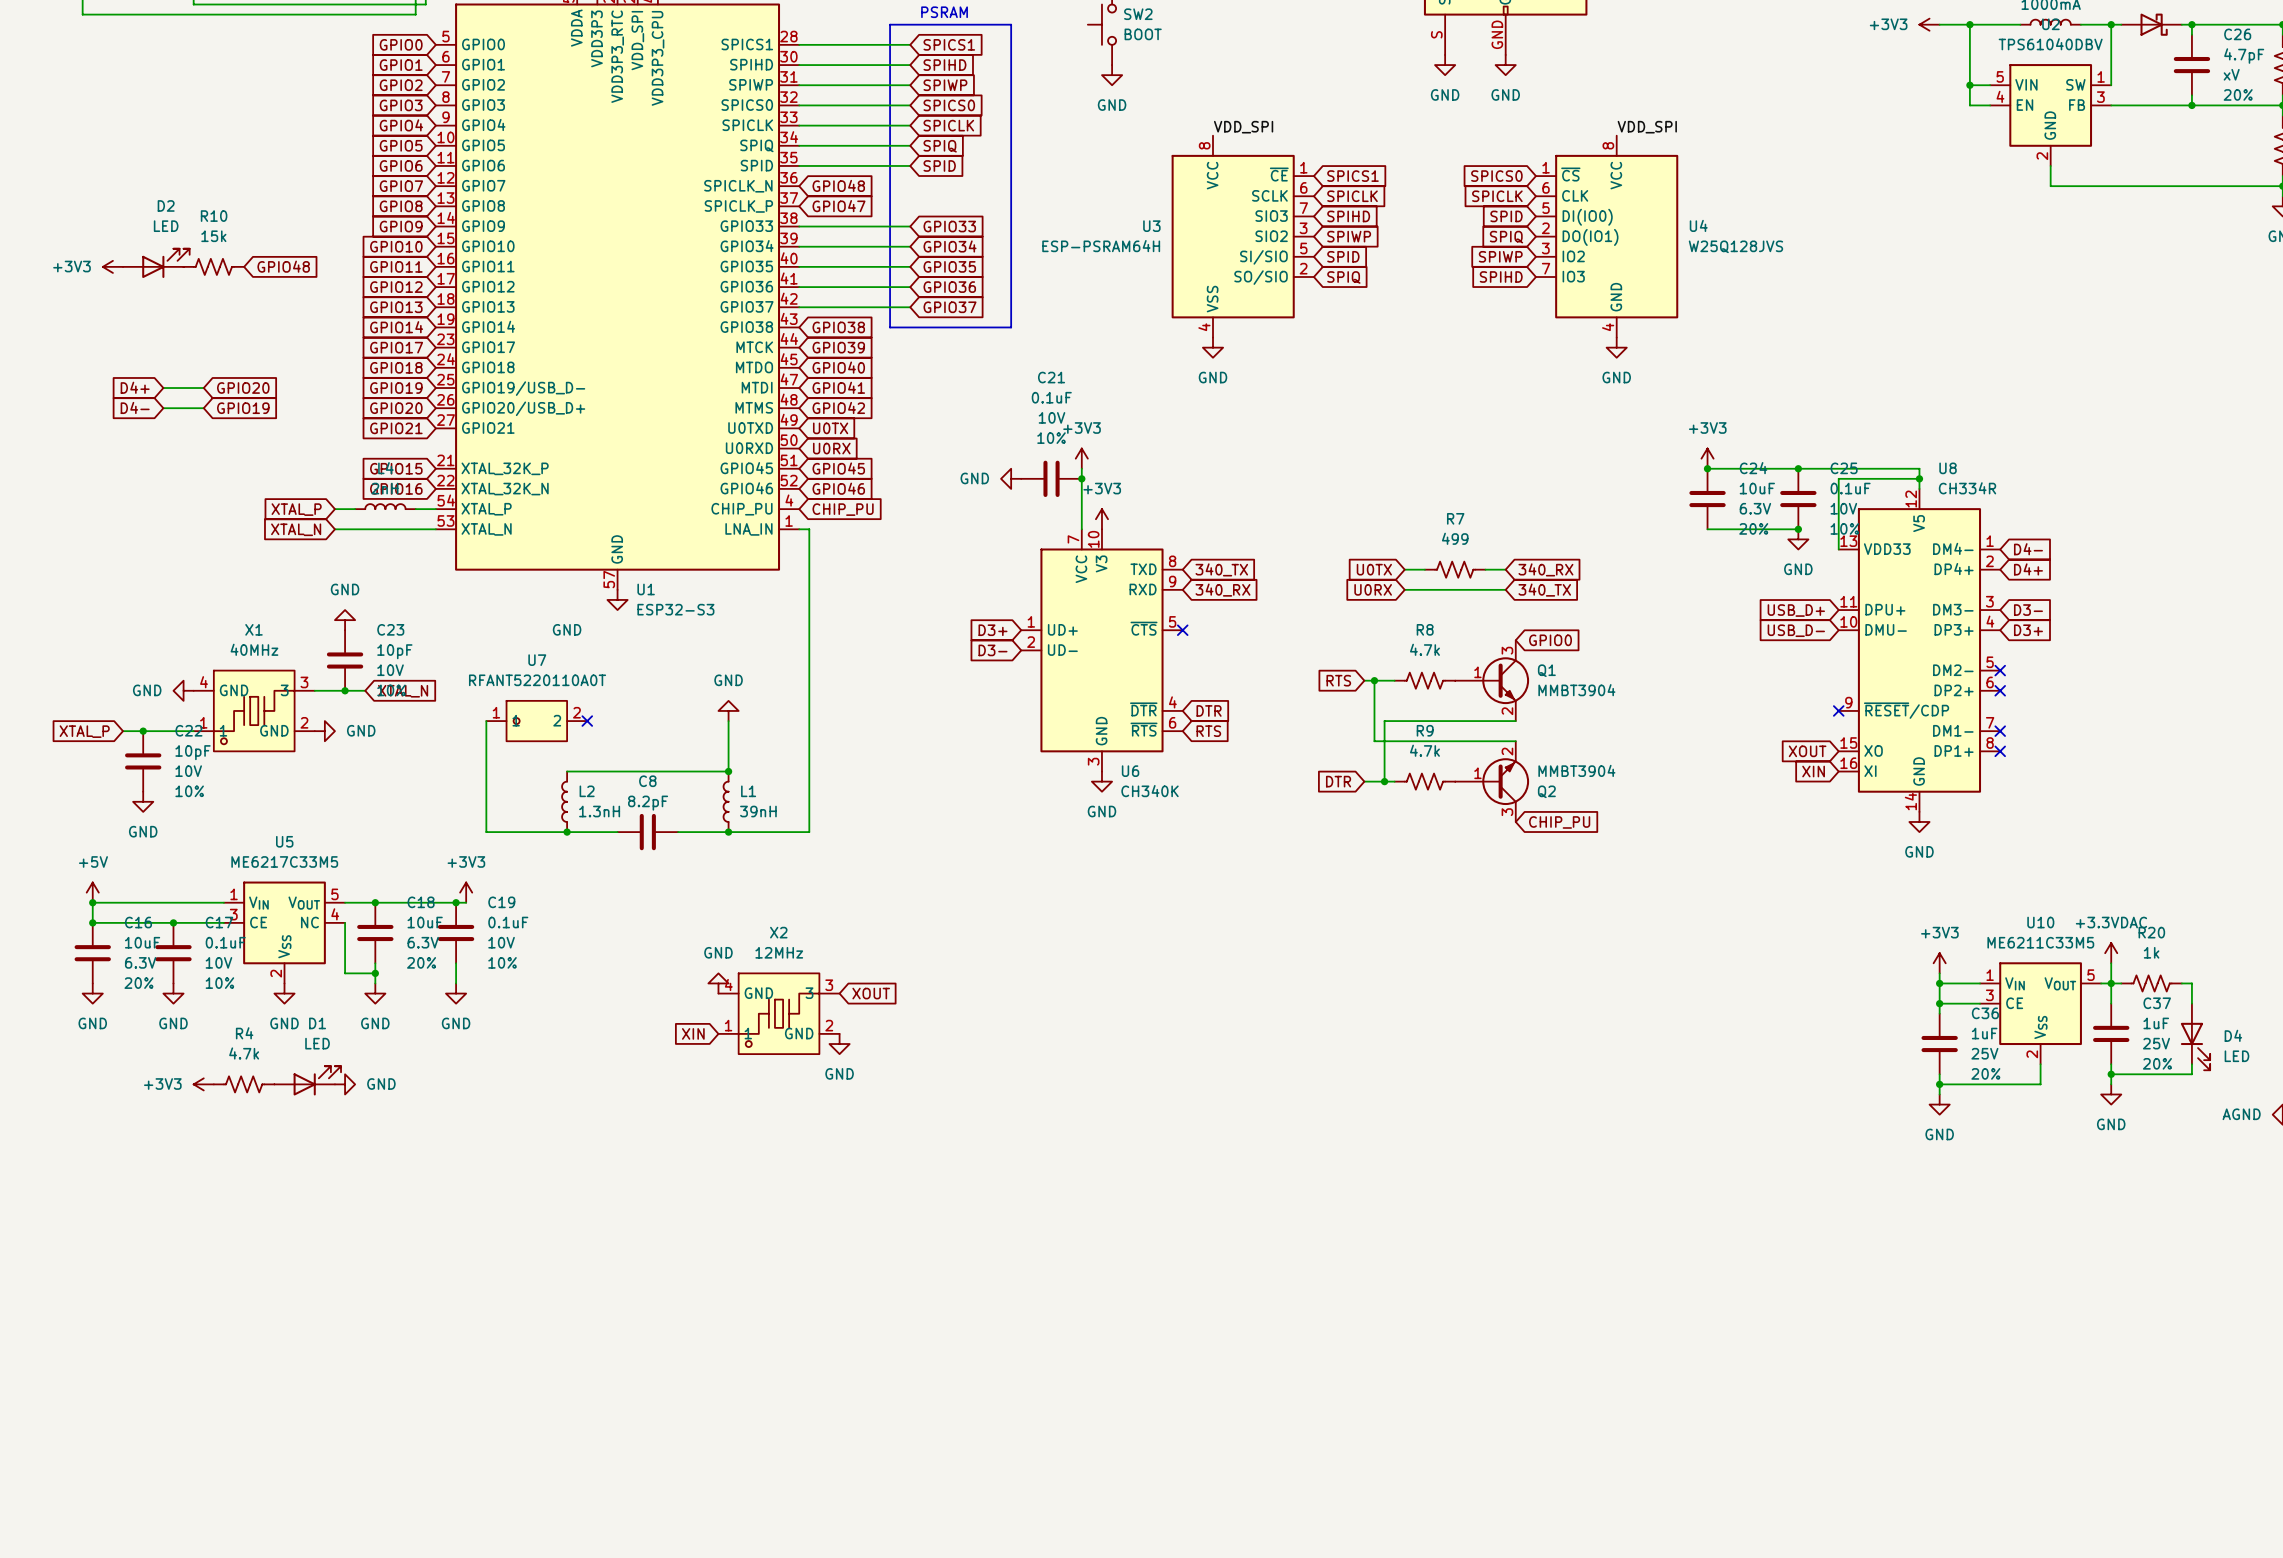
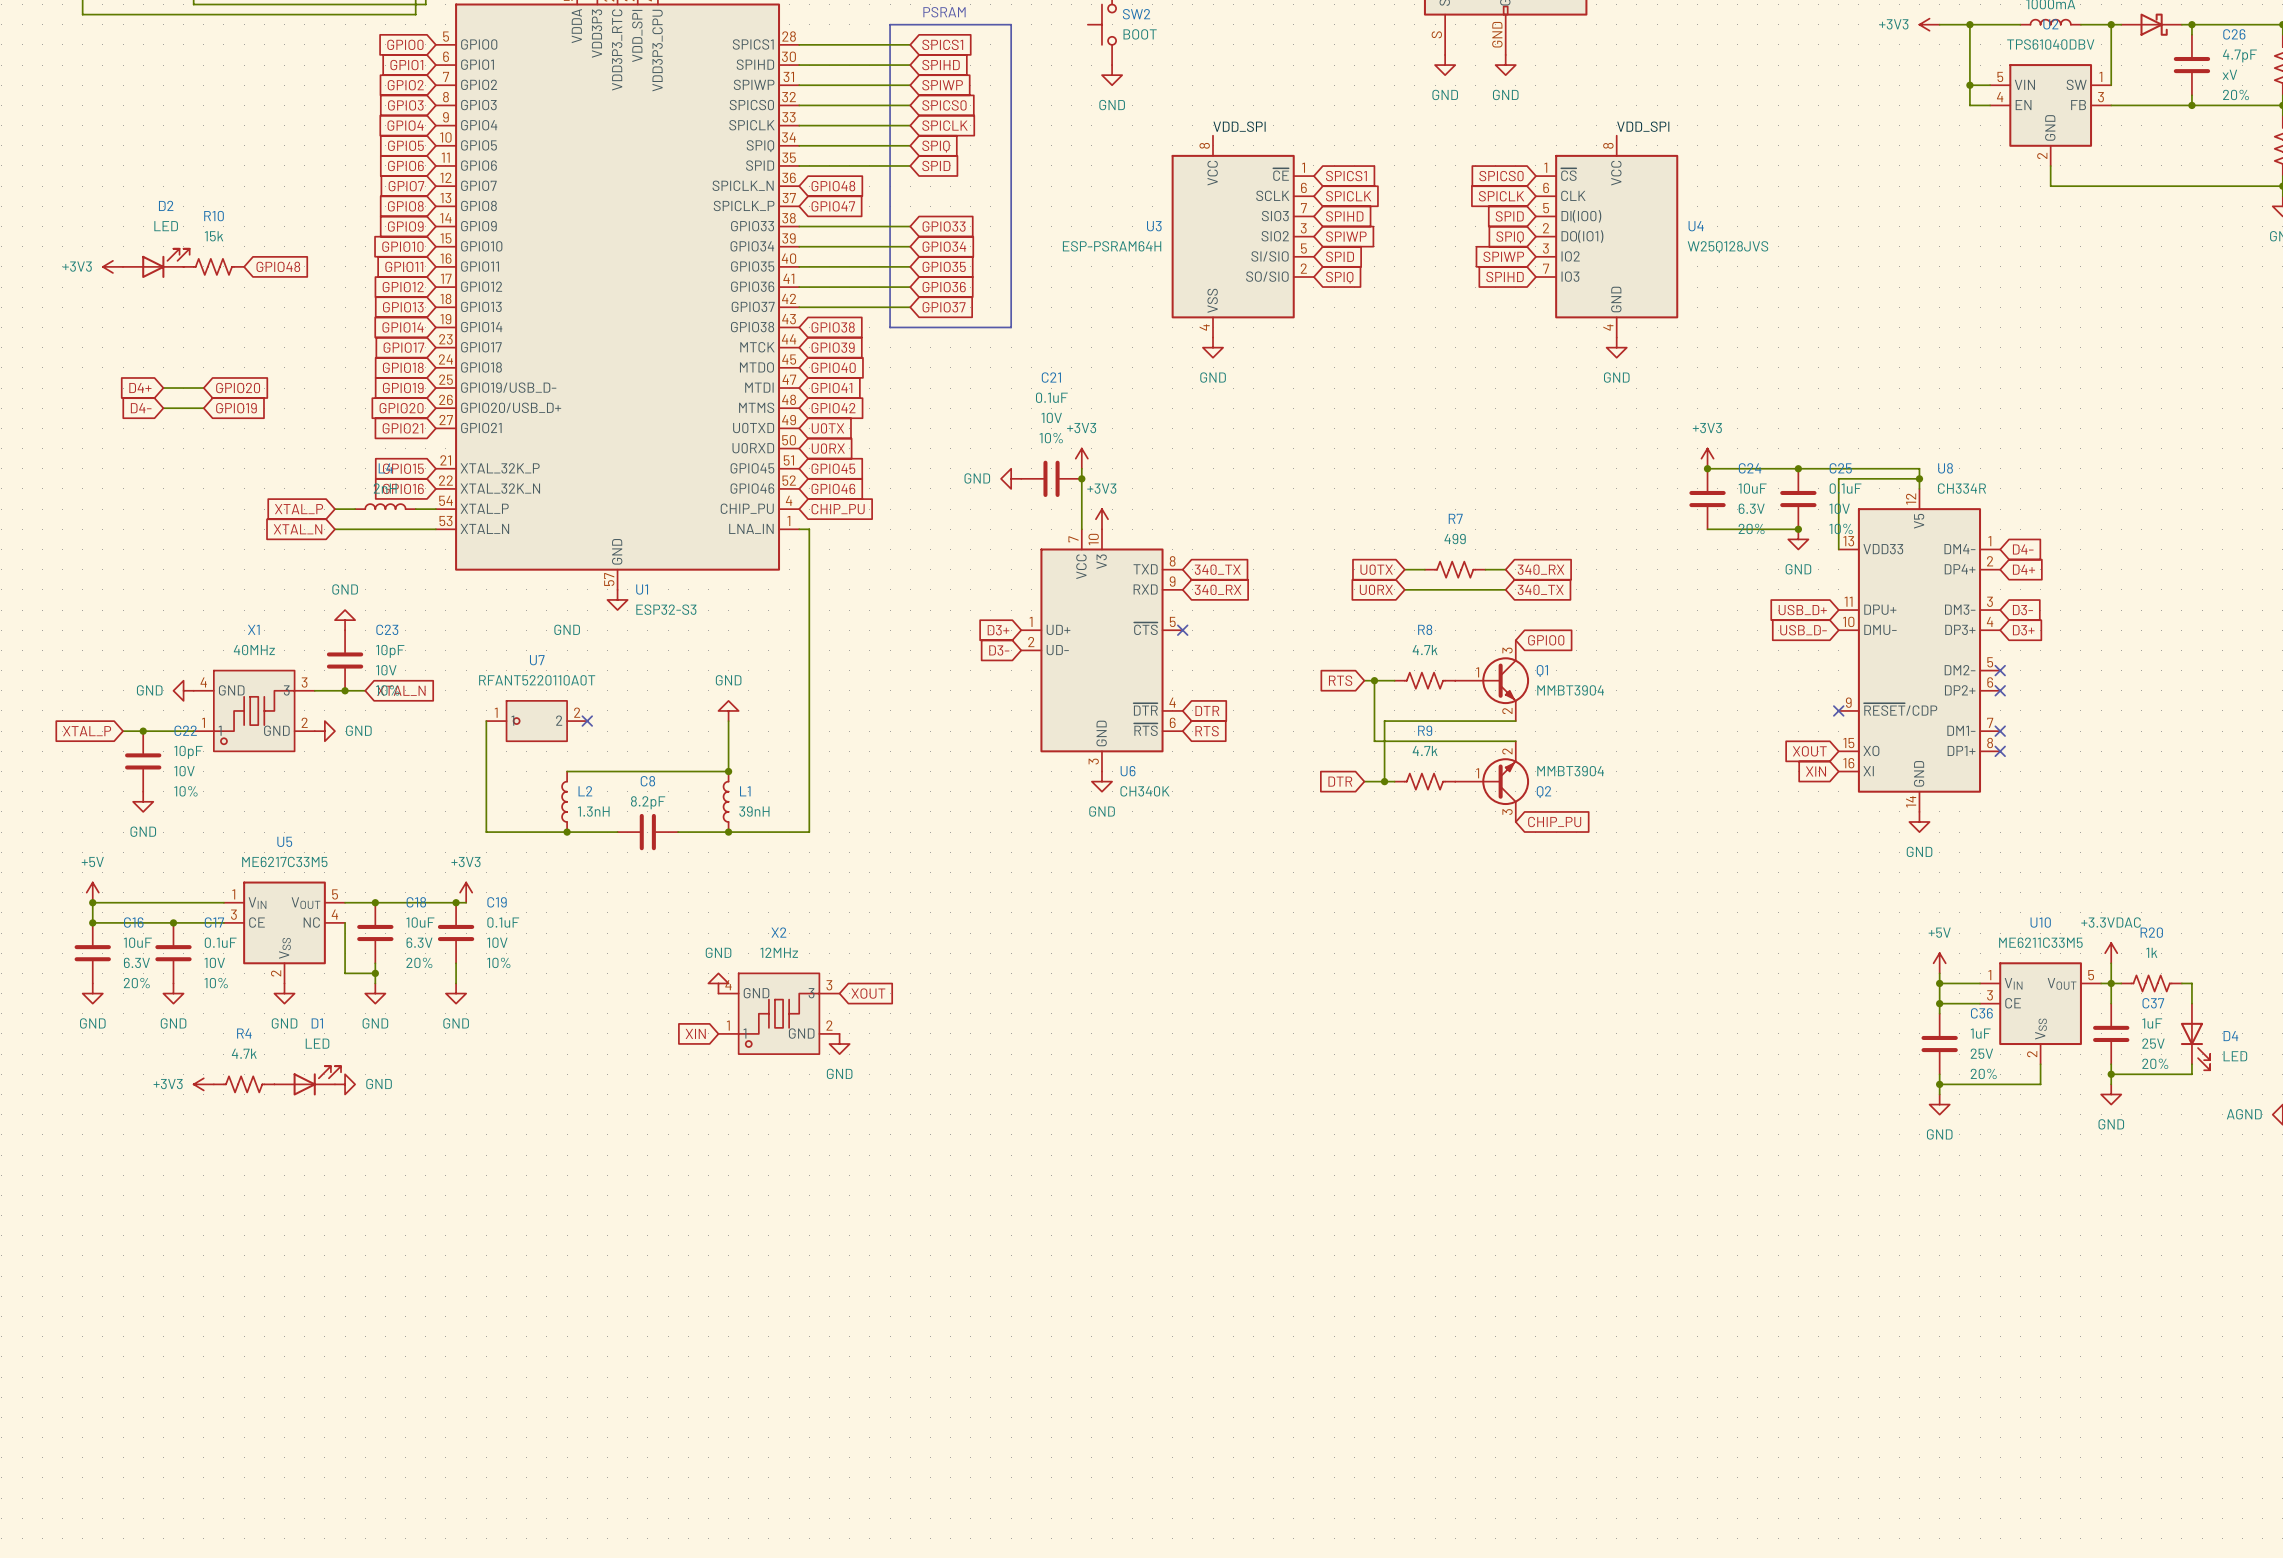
power symbol: +3V3 (1939, 963) -> +5V (1939, 963)

